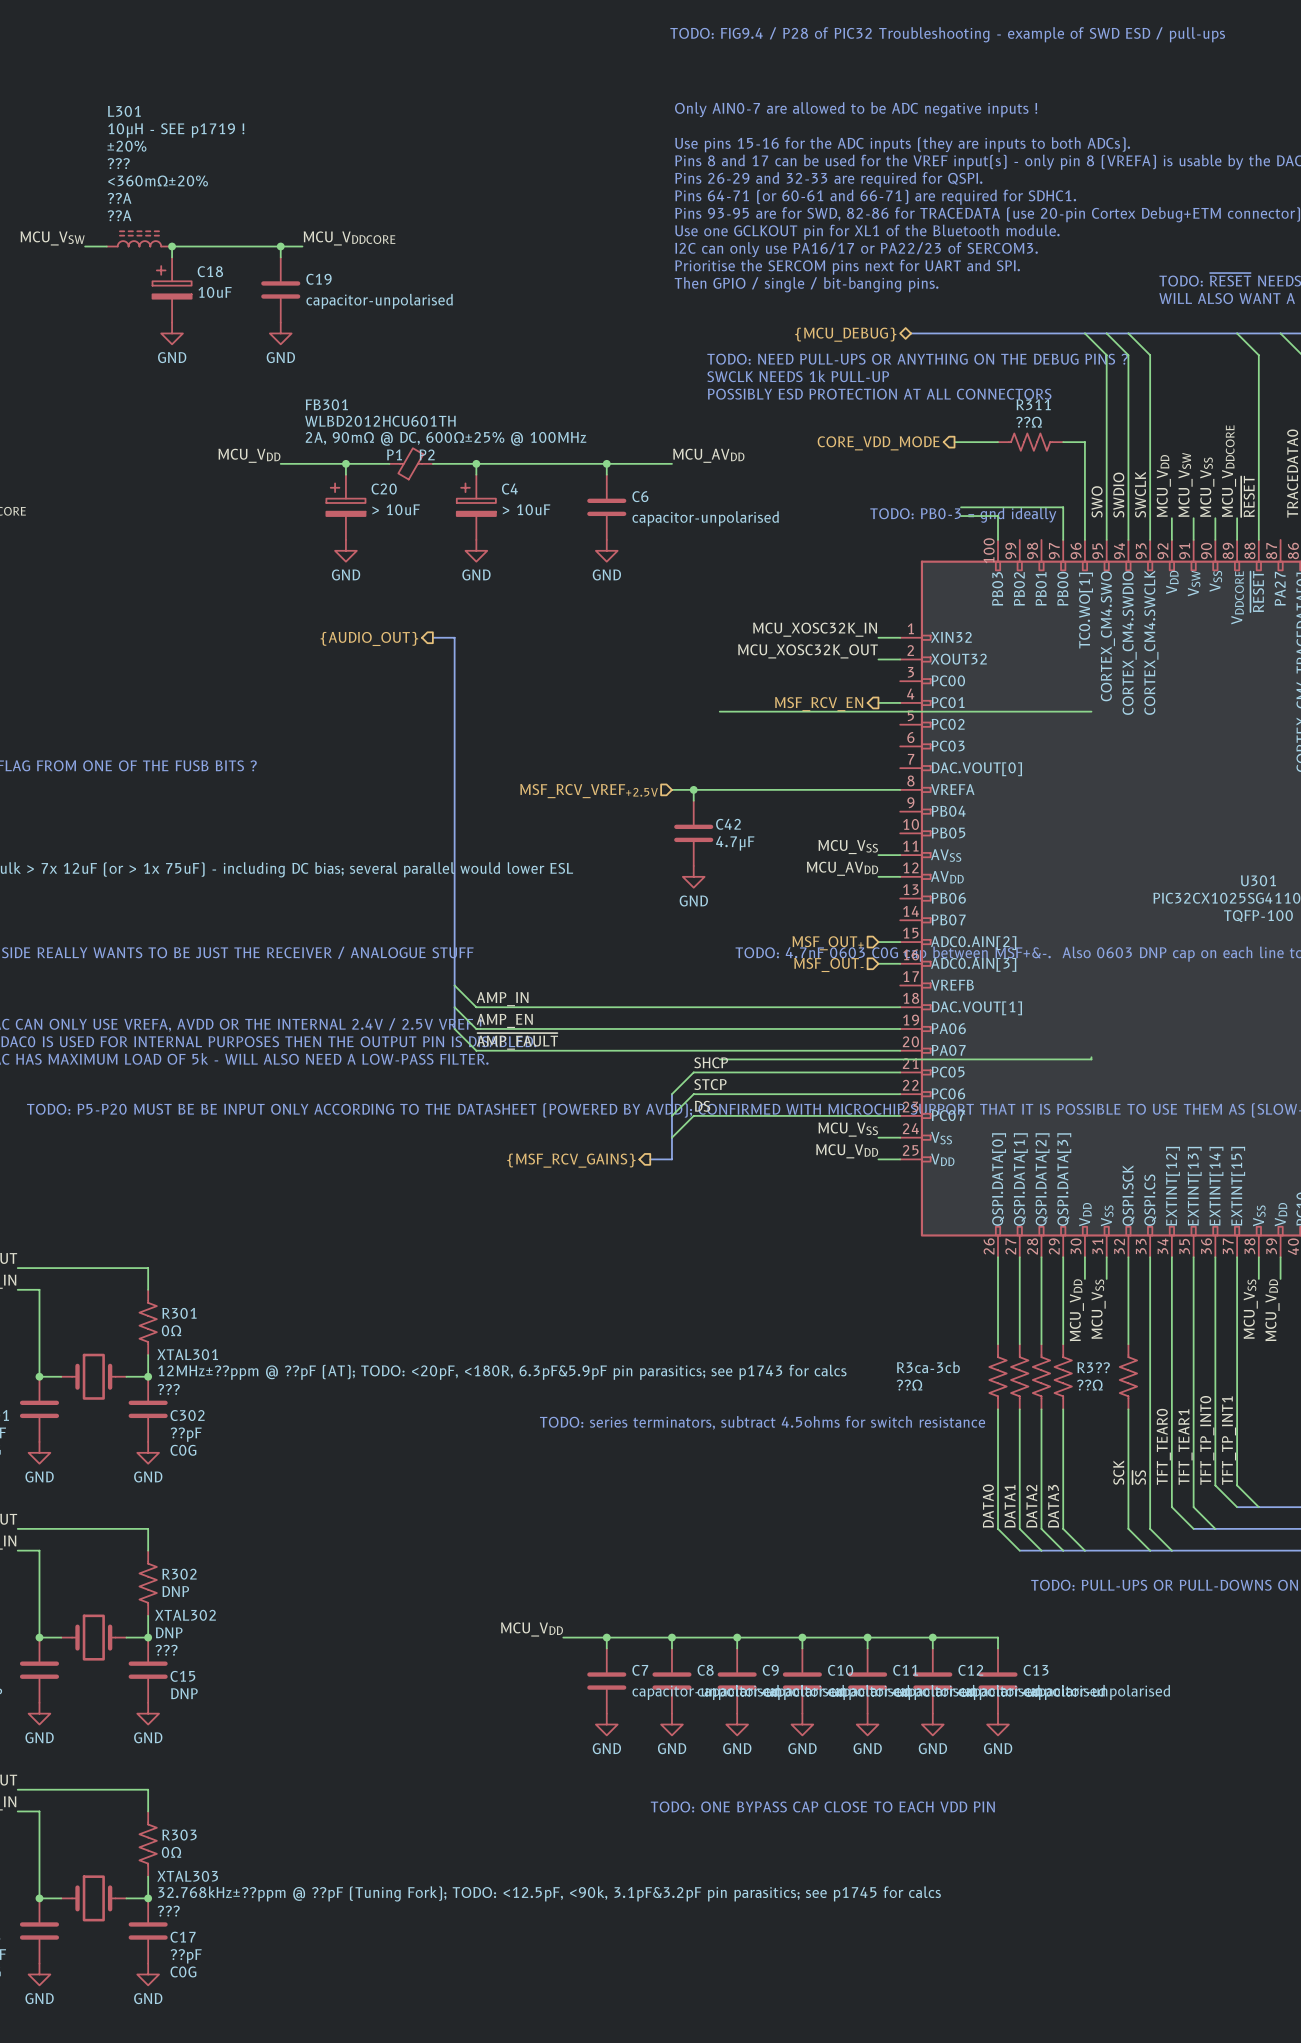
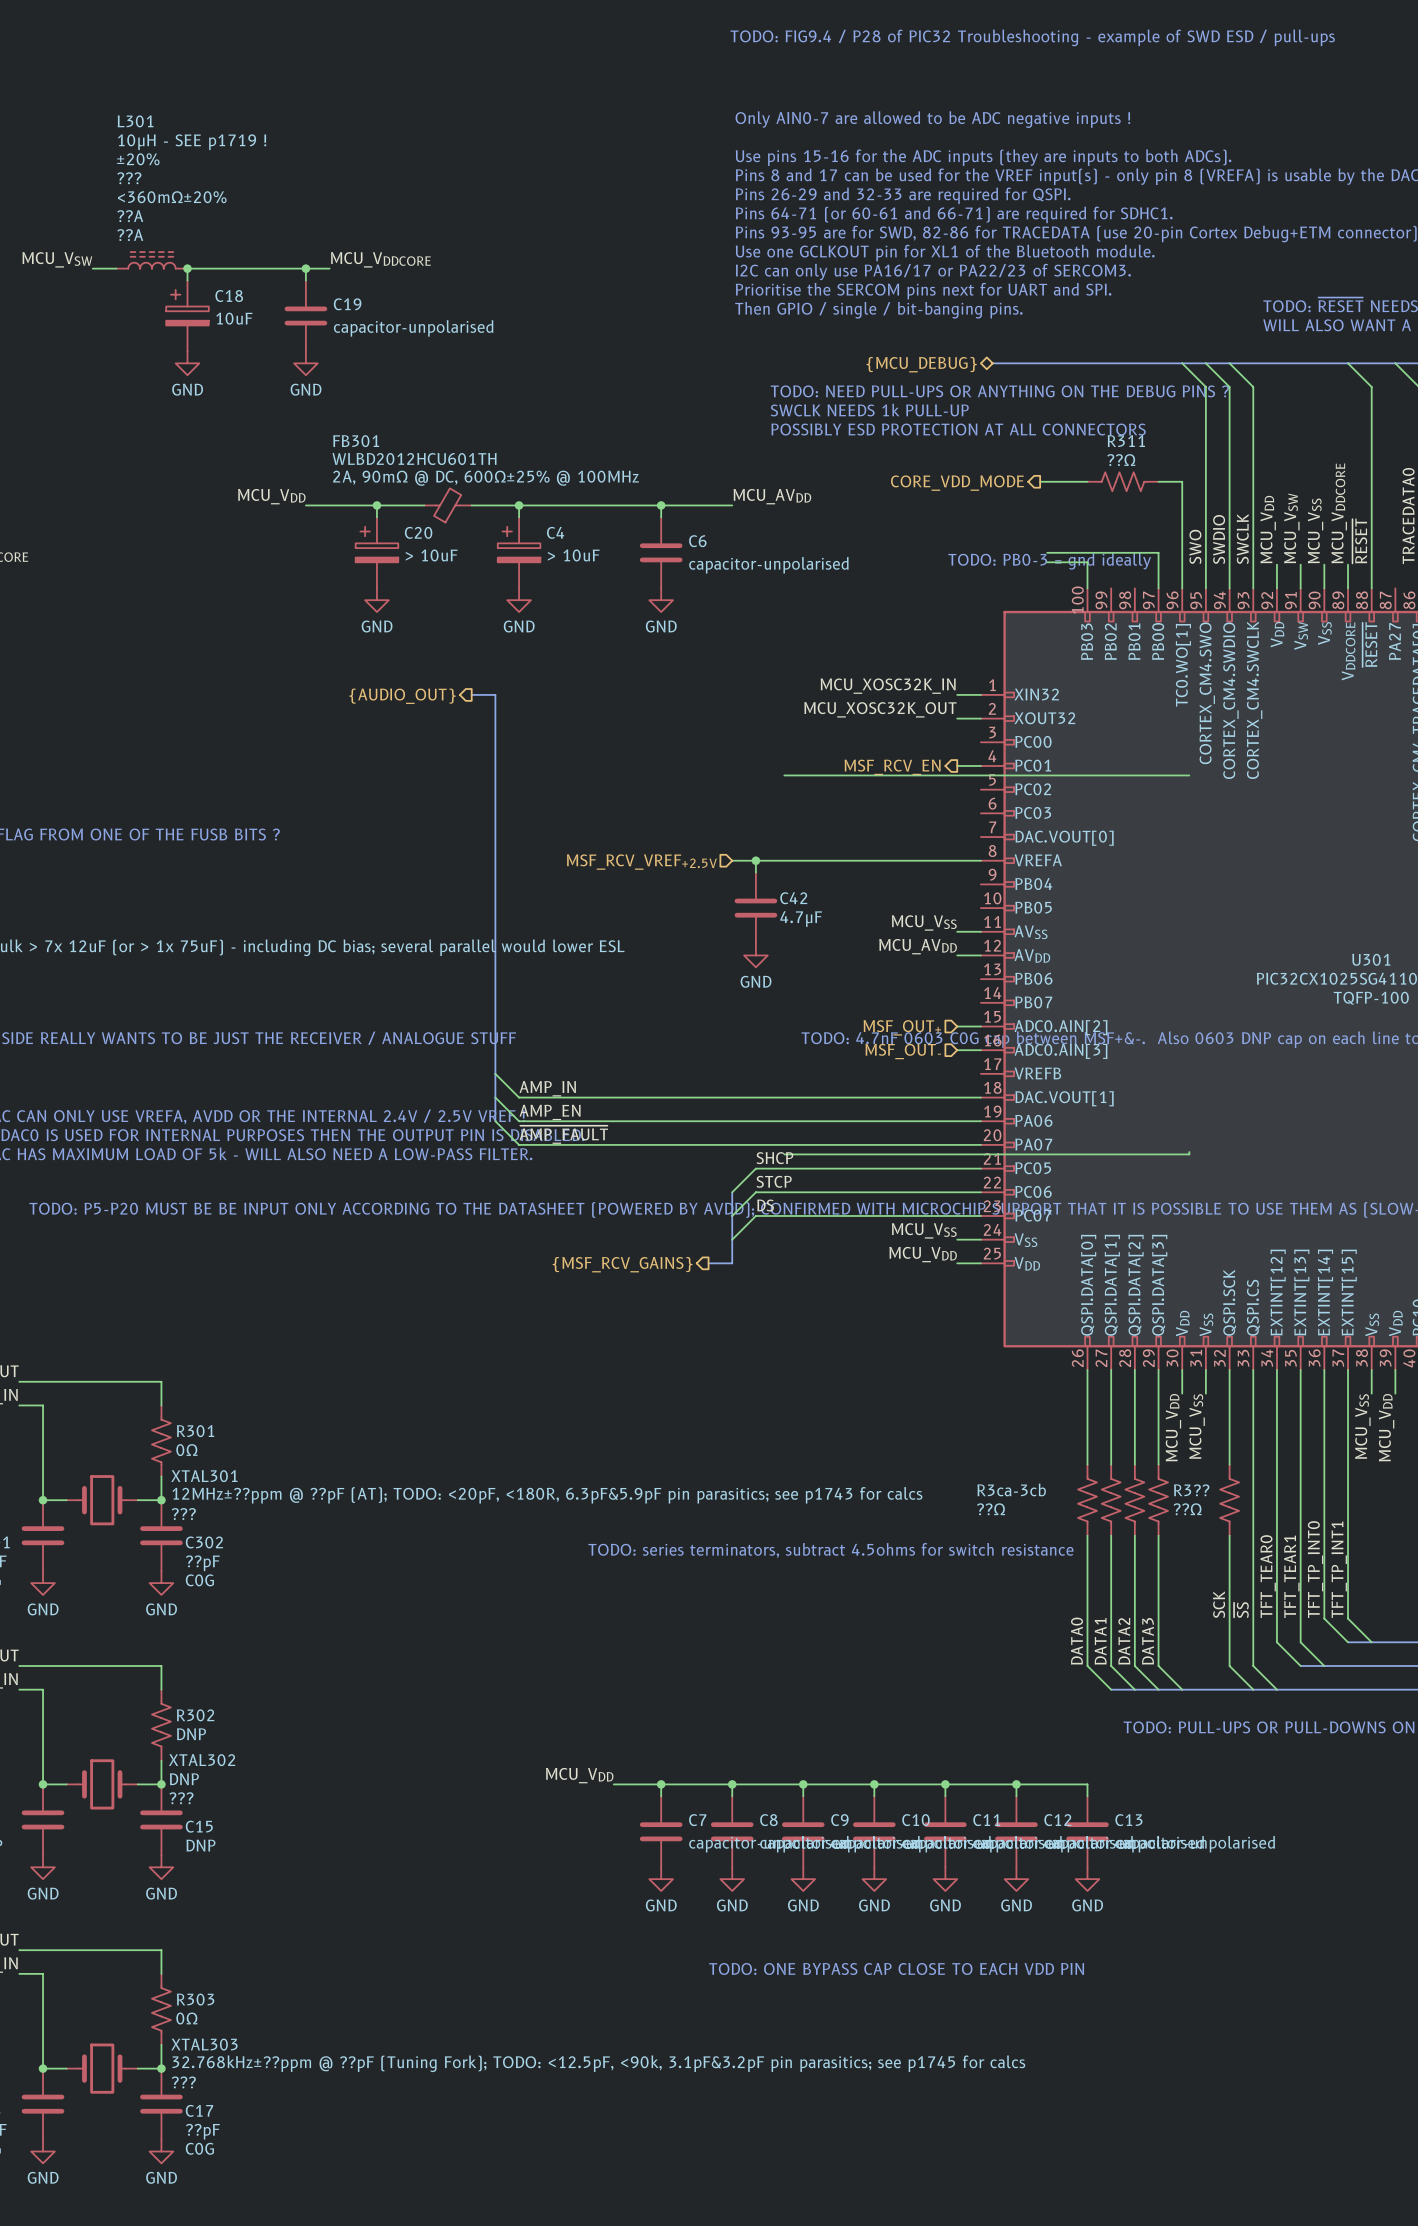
FB301 pin name: P1 (394, 454) -> none
FB301 pin name: P2 (427, 454) -> none

